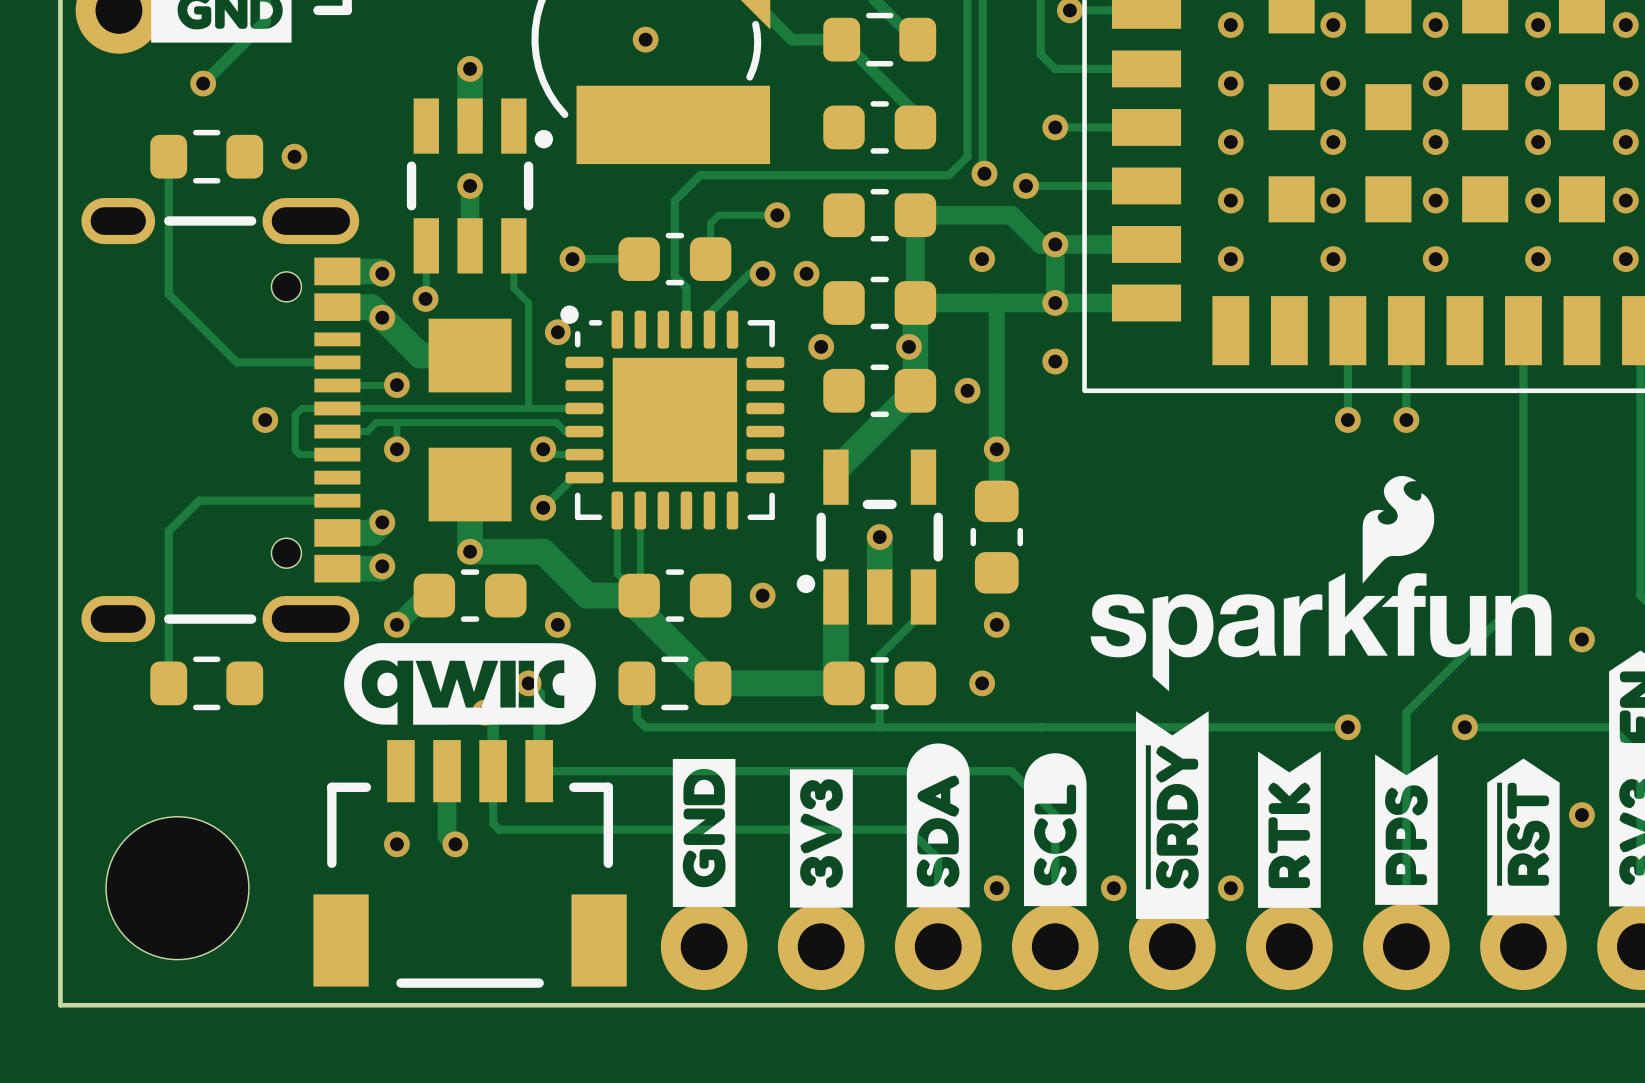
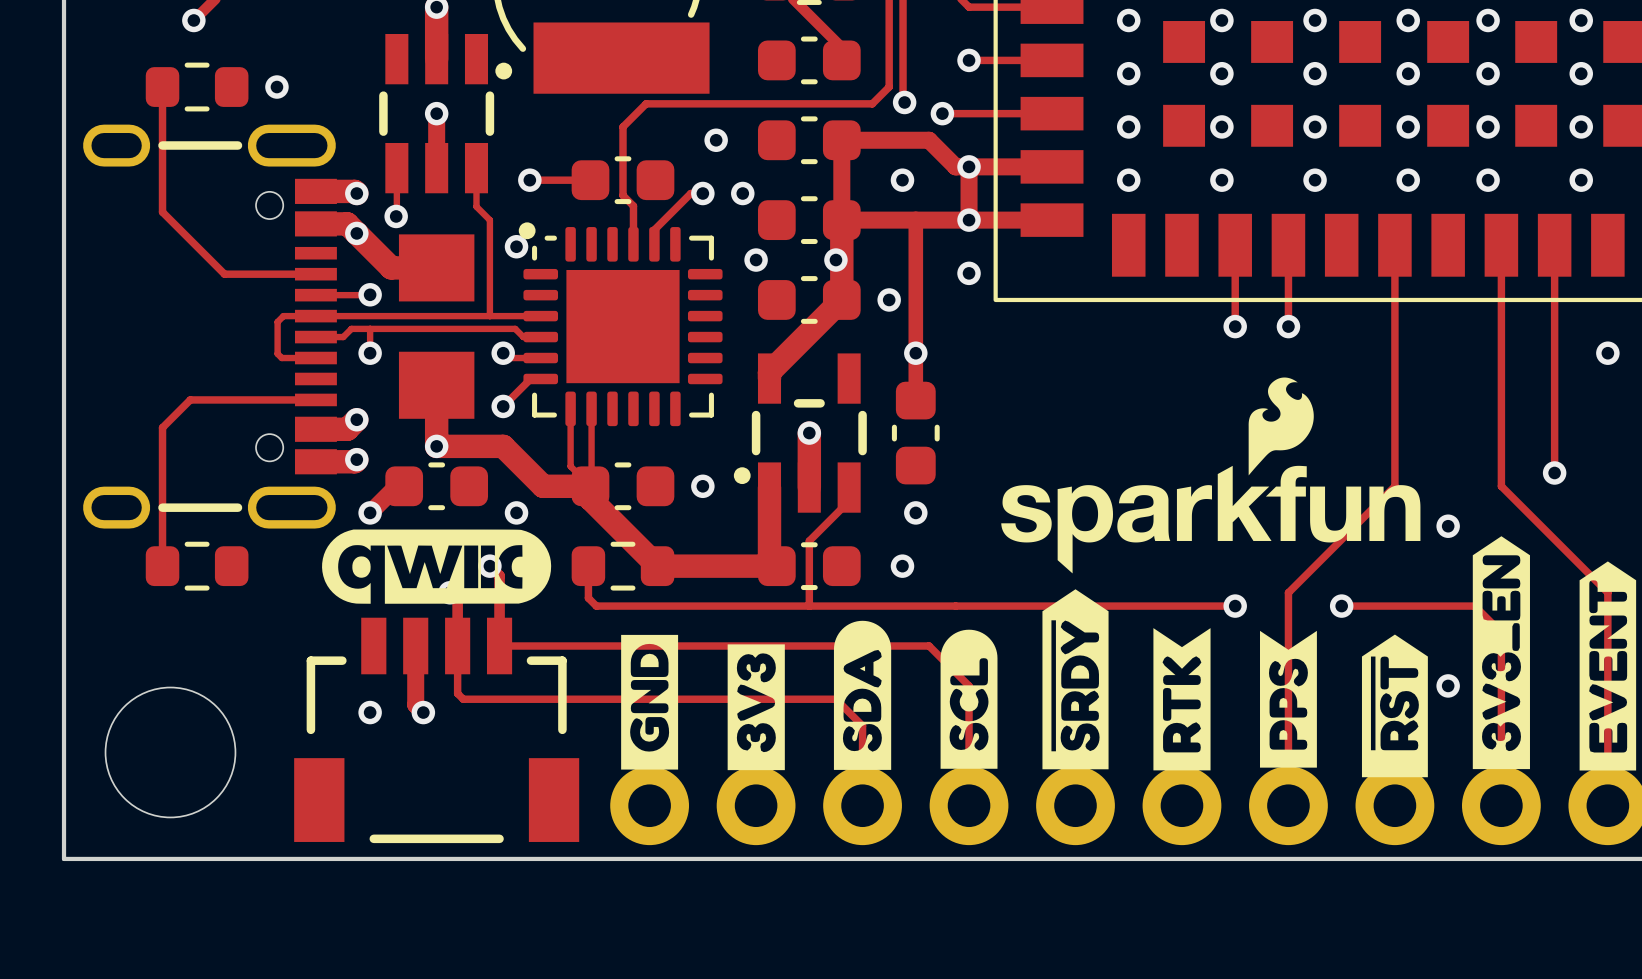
track: (777, 215) (718, 215) (710, 223) (710, 259) -> none
via: (265, 420) -> none
drawing shape: [1135, 711, 1209, 919] -> [1042, 589, 1109, 770]
via: (996, 888) -> none
via: (1113, 888) -> none
via: (1230, 888) -> none

